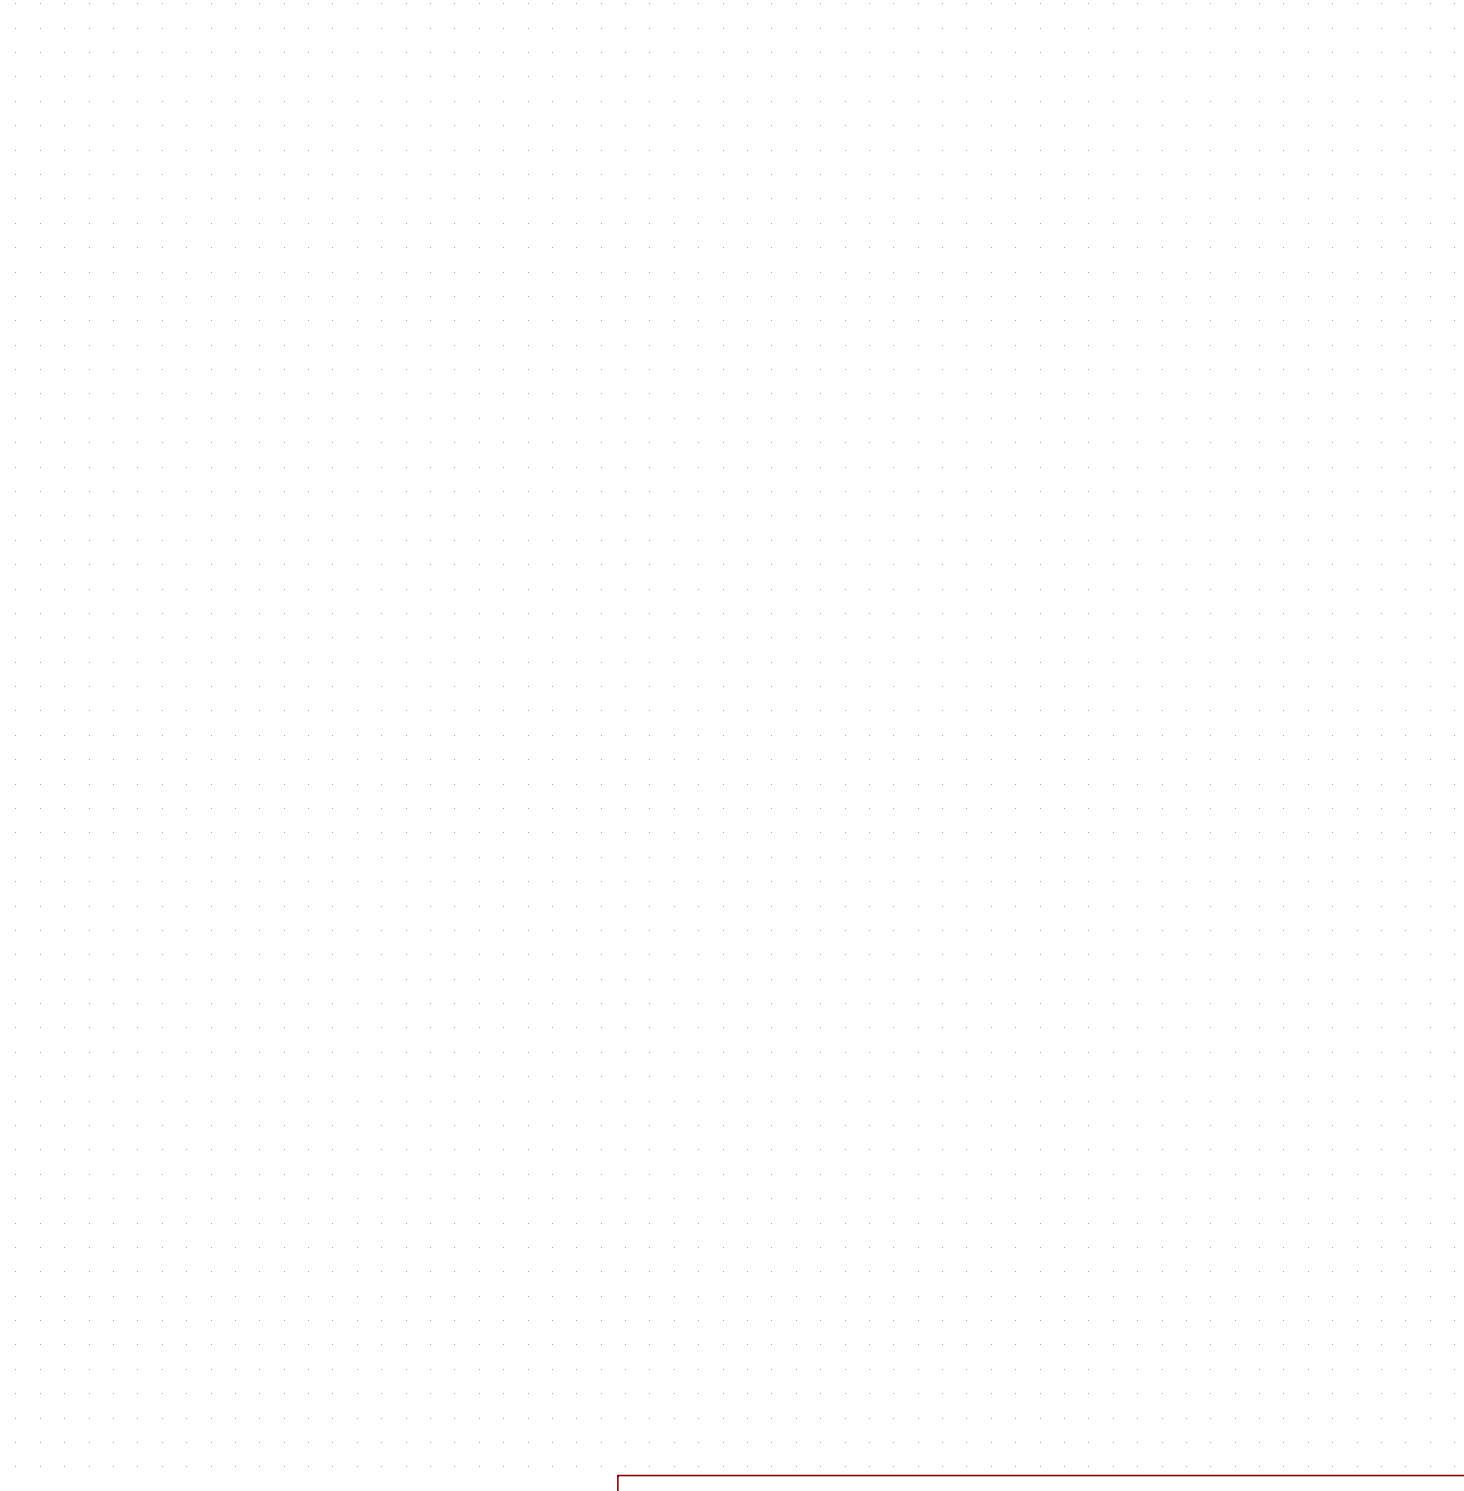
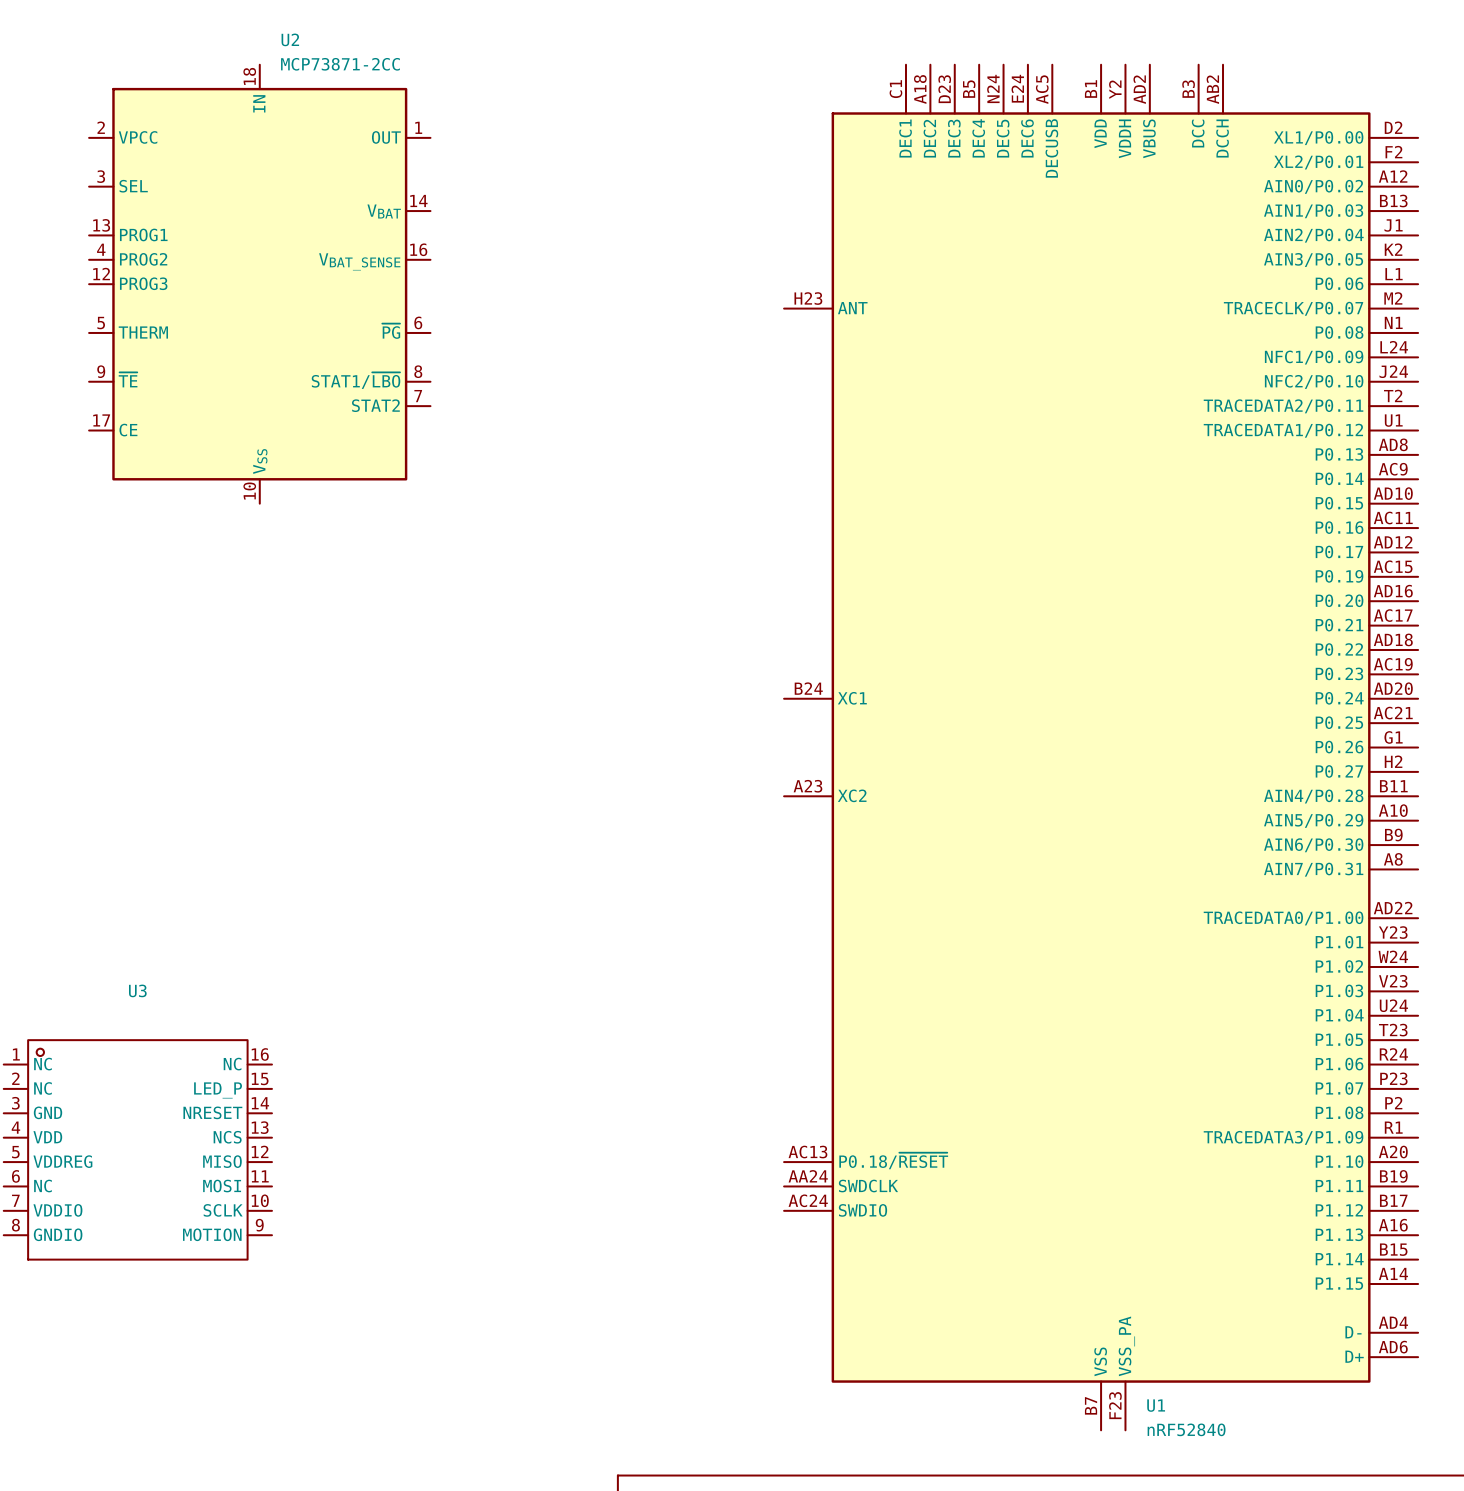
U2: none -> MCP73871-2CC (259, 284)
U1: none -> nRF52840 (1101, 747)
U3: none -> (137, 1149)

